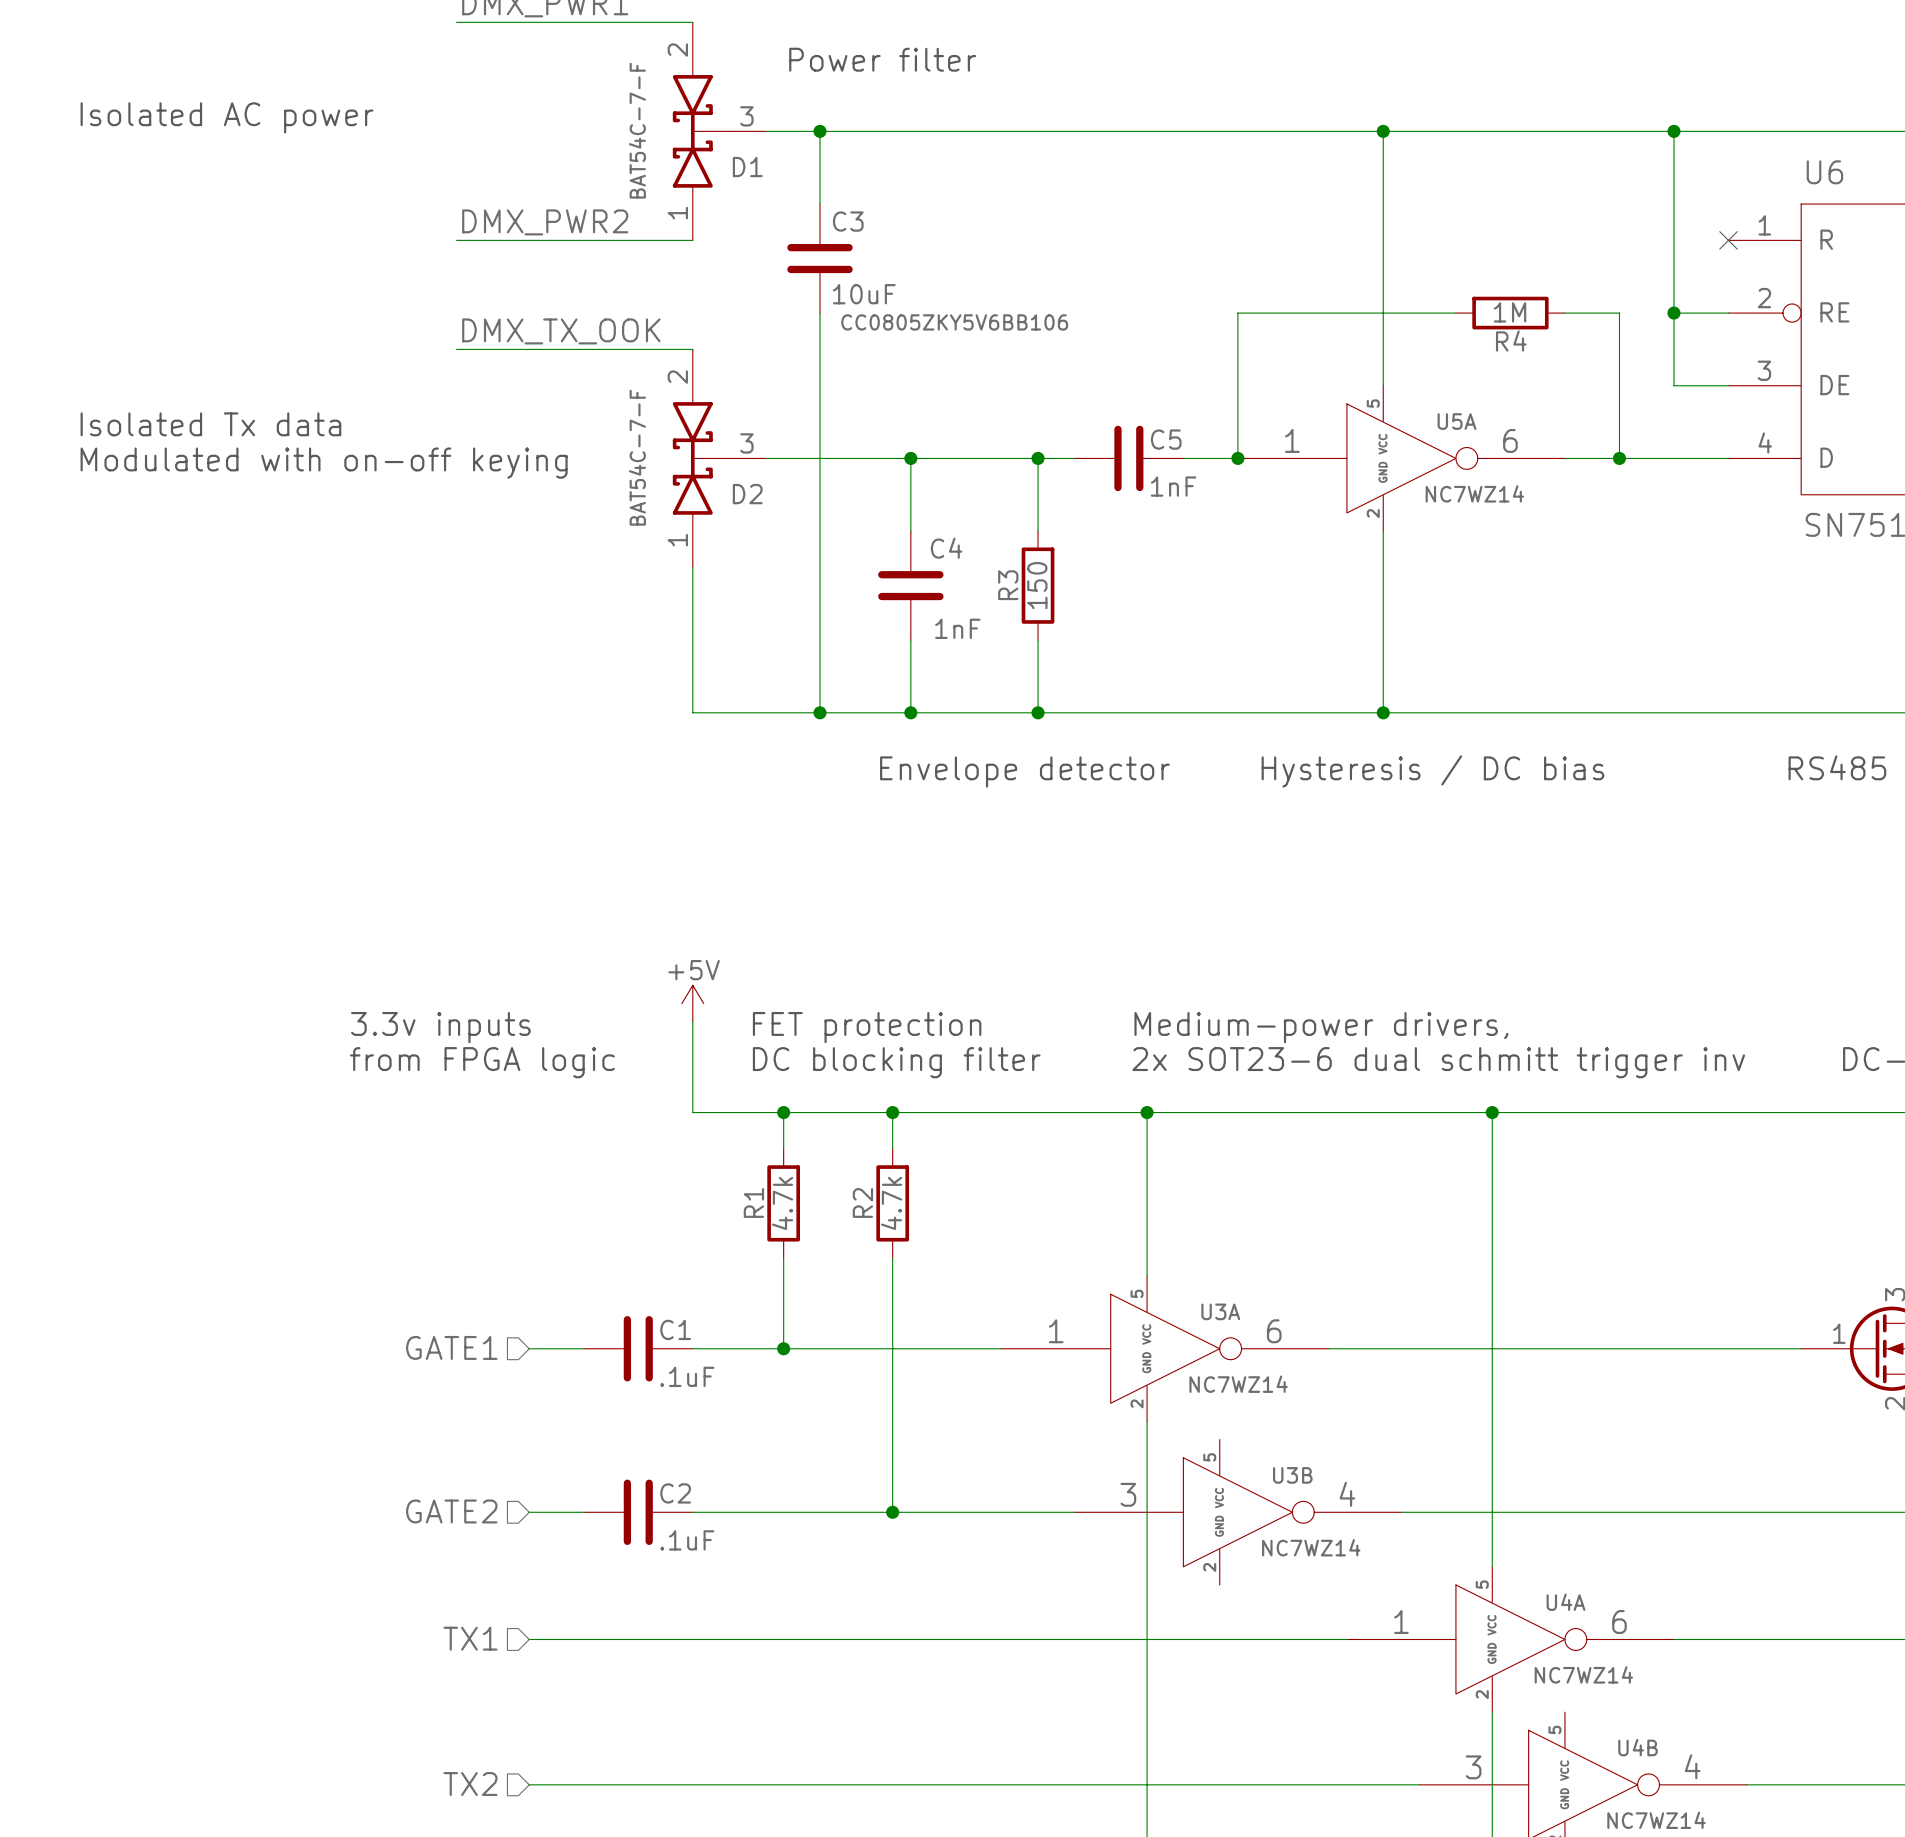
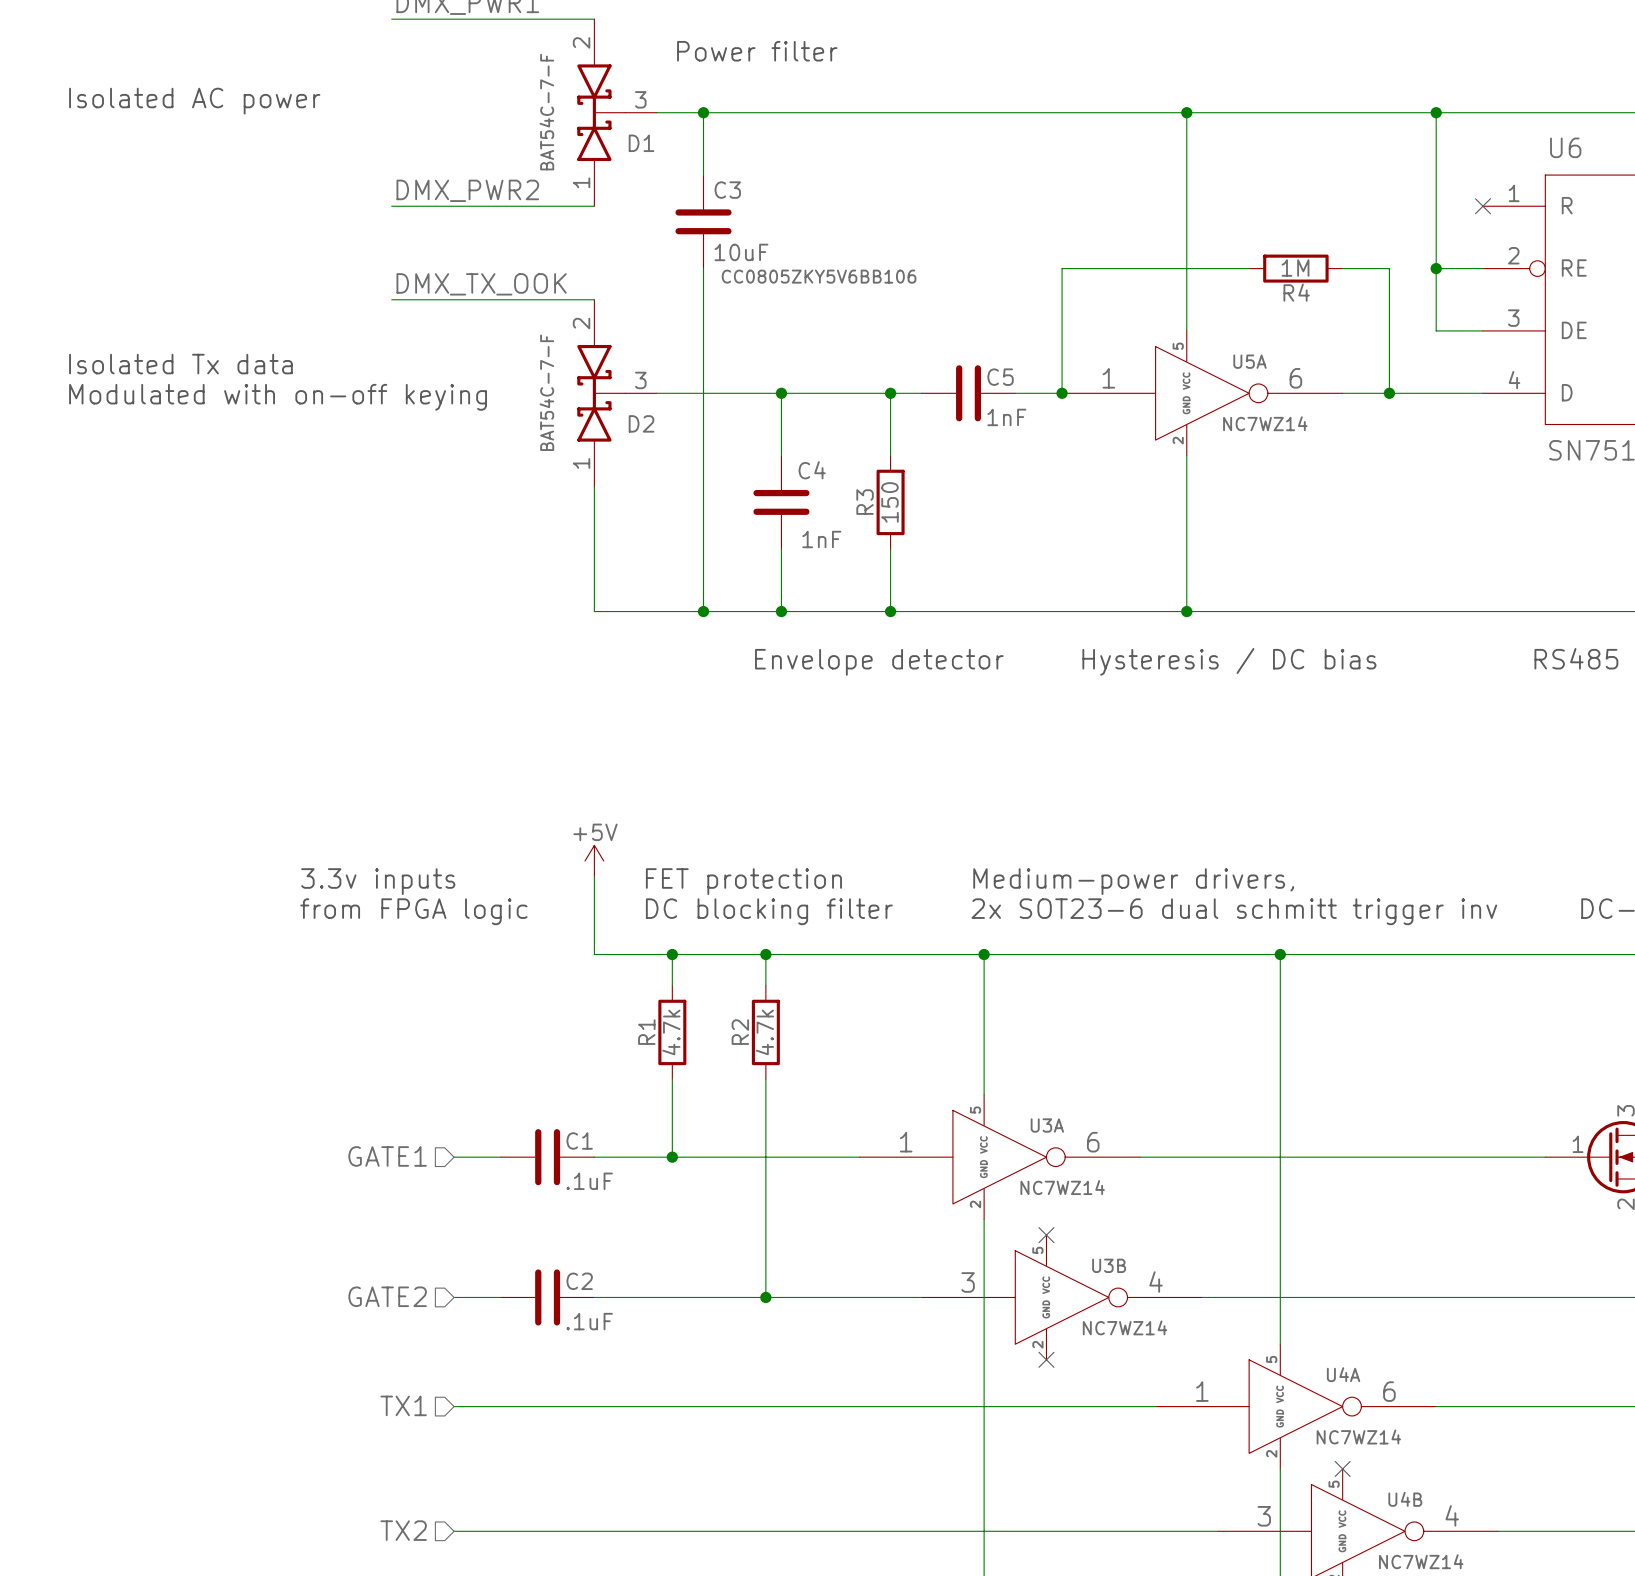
no-connect mark: none -> (1046, 1235)
no-connect mark: none -> (1046, 1359)
no-connect mark: none -> (1342, 1468)

